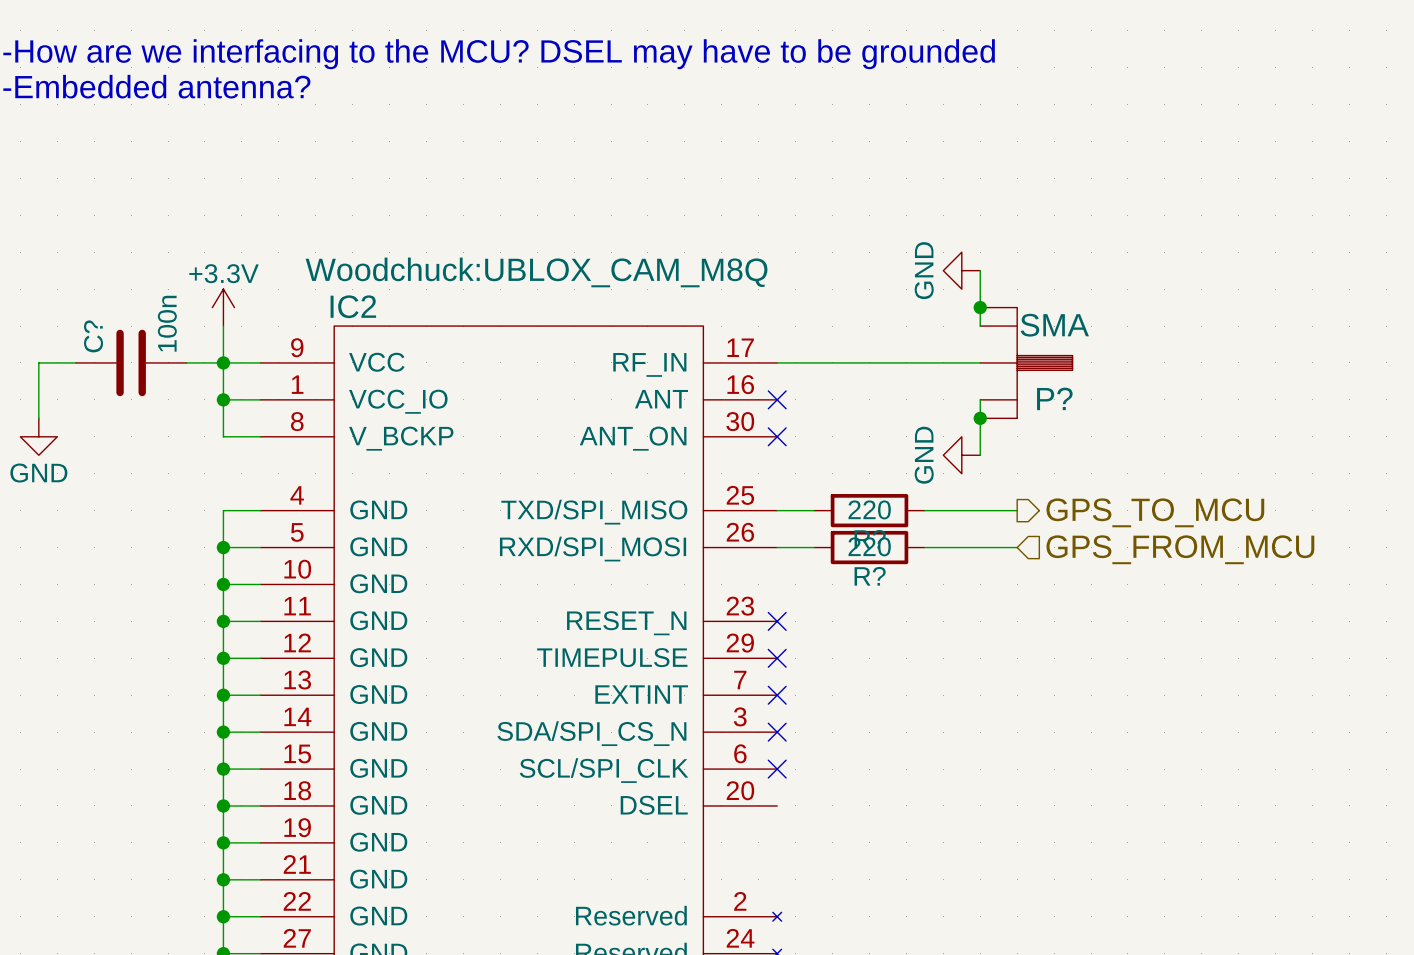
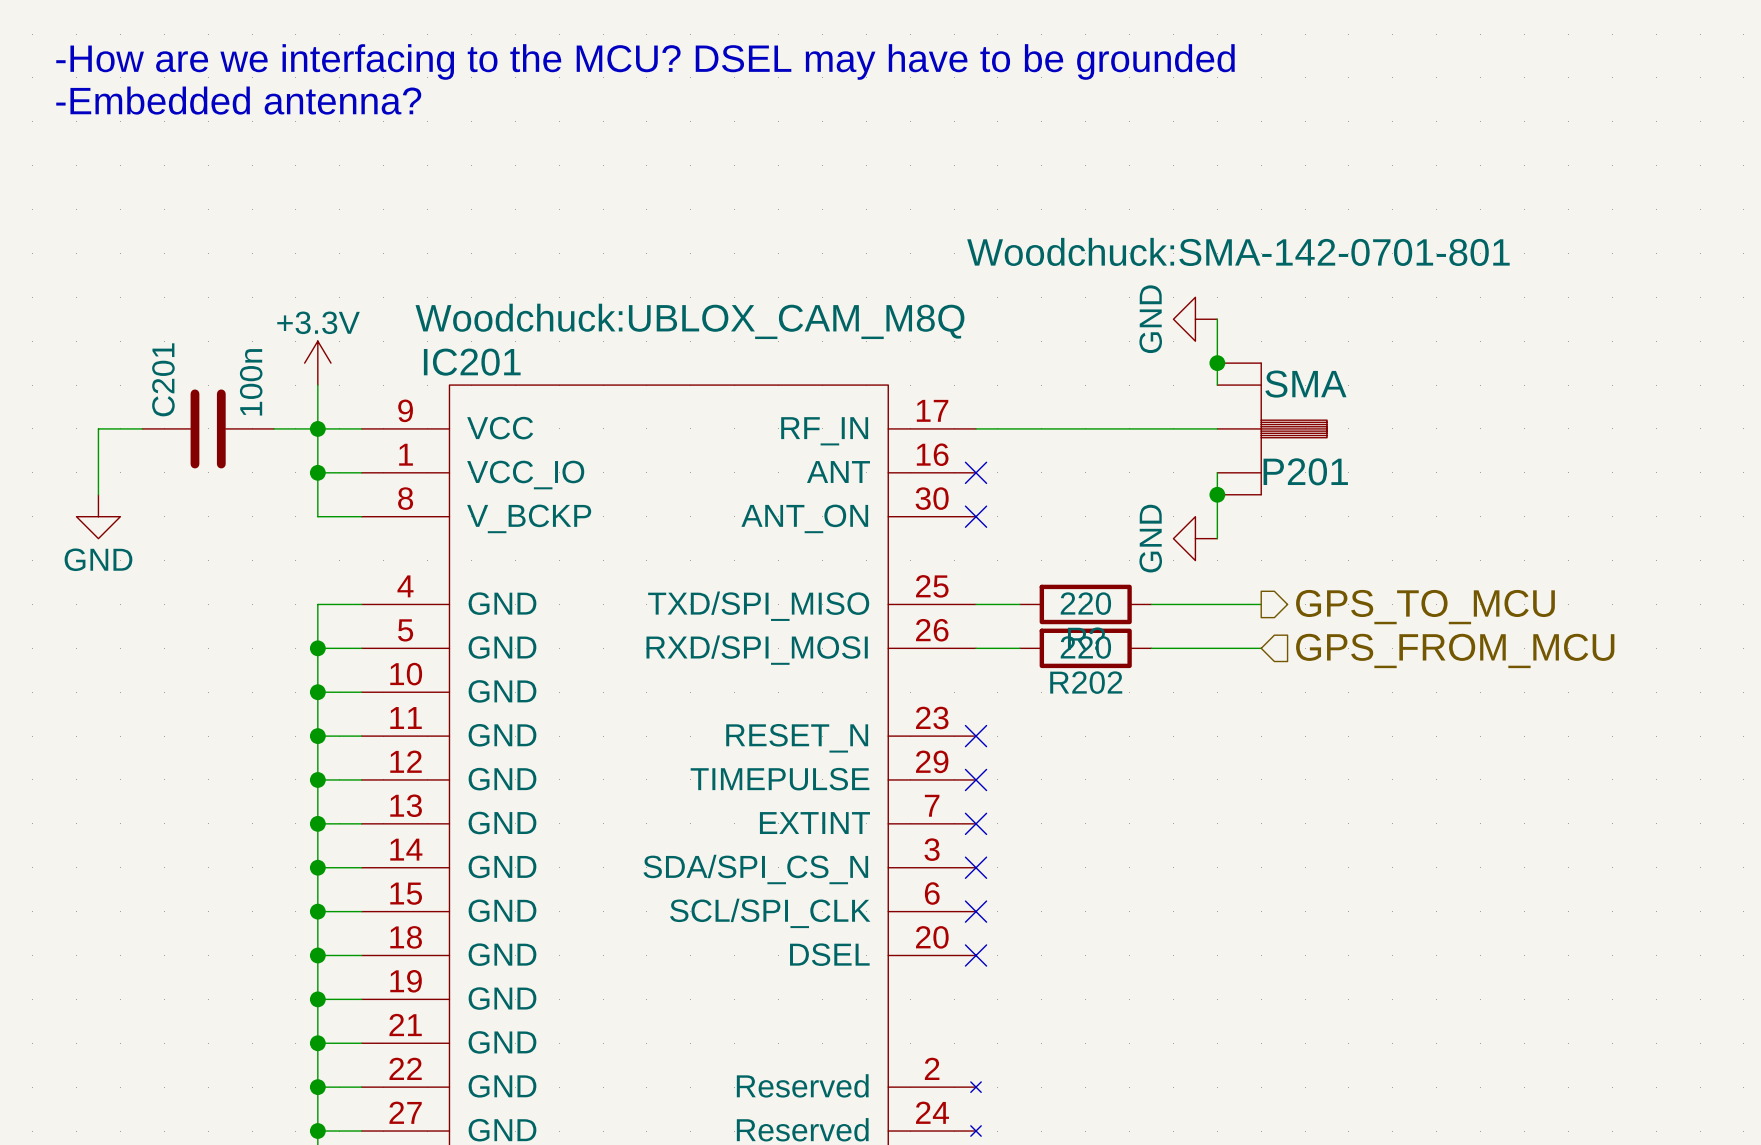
P? text: none -> Woodchuck:SMA-142-0701-801 (1238, 251)
IC2 name: IC2 (353, 306) -> IC201 (472, 362)
C? name: C? (93, 336) -> C201 (163, 379)
P? name: P? (1054, 398) -> P201 (1305, 471)
R? name: R? (870, 576) -> R202 (1086, 682)
no-connect mark: none -> (976, 955)

